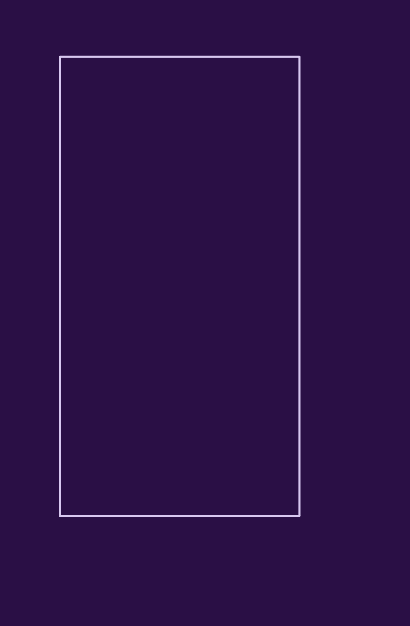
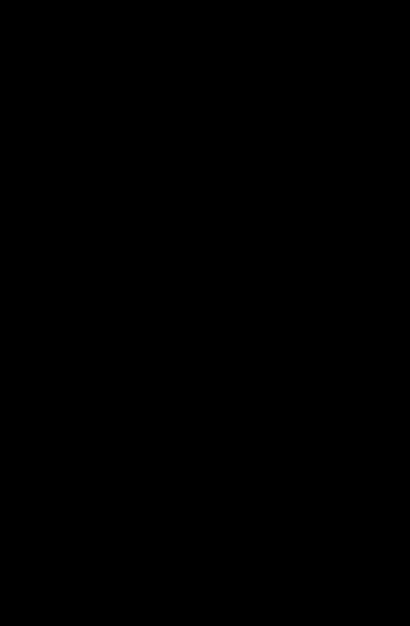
part: (179, 286) -> none

